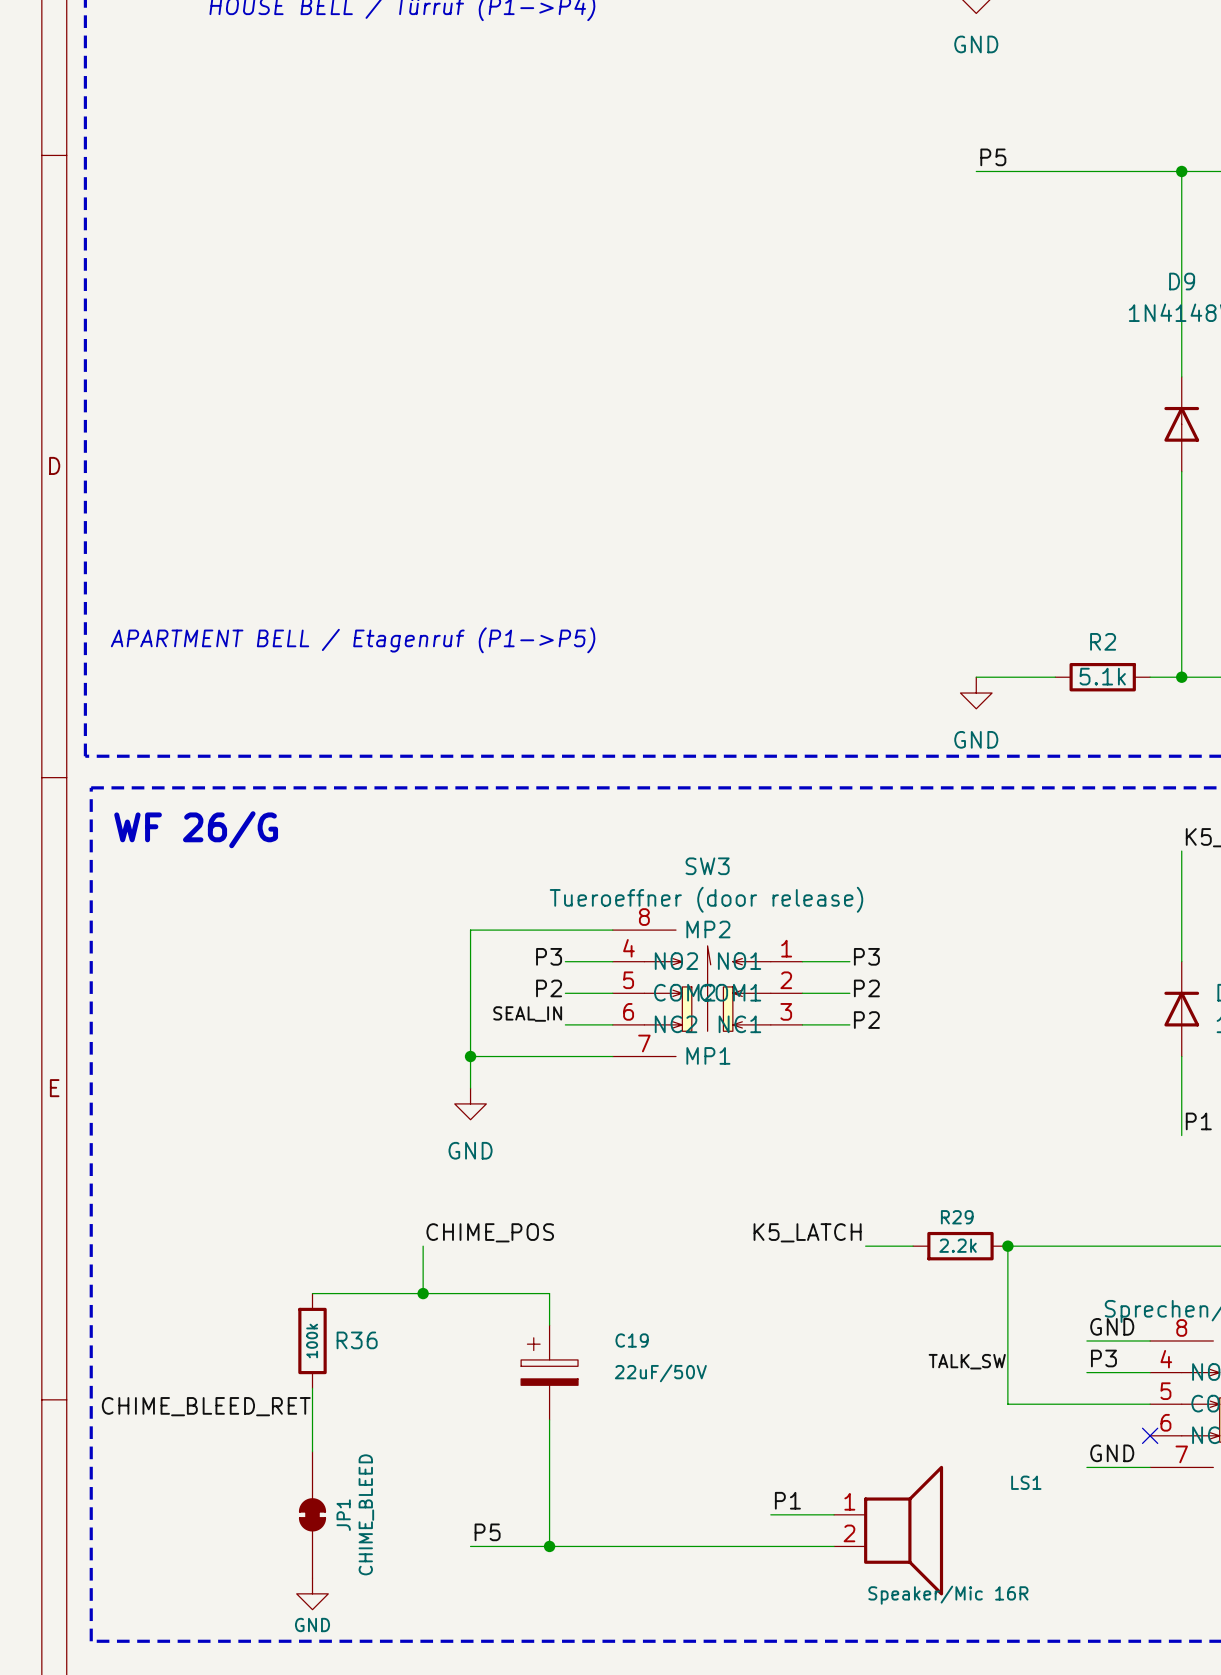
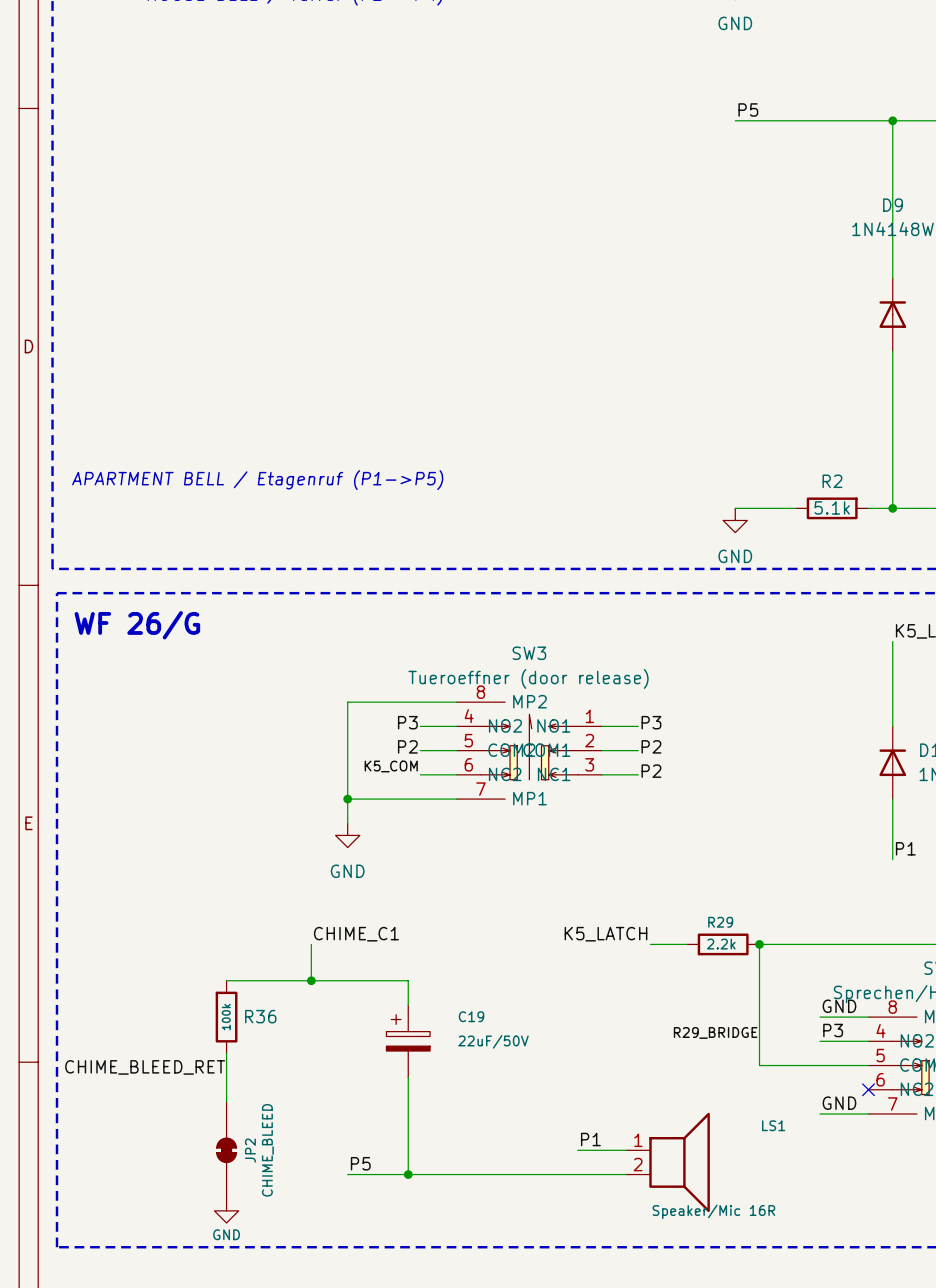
label: SEAL_IN (527, 1013) -> K5_COM (391, 766)
label: CHIME_POS (490, 1232) -> CHIME_C1 (356, 934)
label: TALK_SW (967, 1361) -> R29_BRIDGE (715, 1032)
JP1 name: JP1 (343, 1515) -> JP2 (250, 1150)

